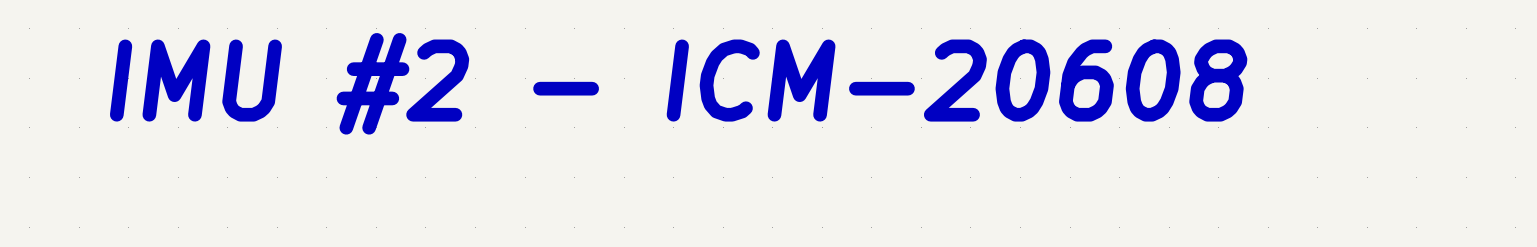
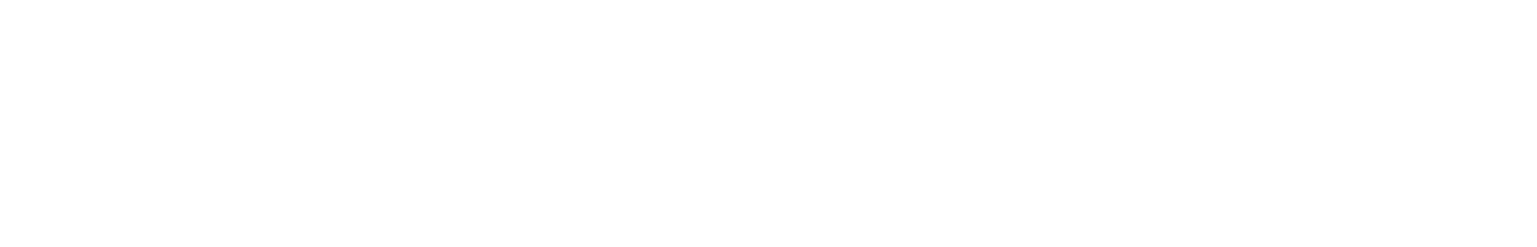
text: IMU #2 - ICM-20608 (678, 83) -> none

